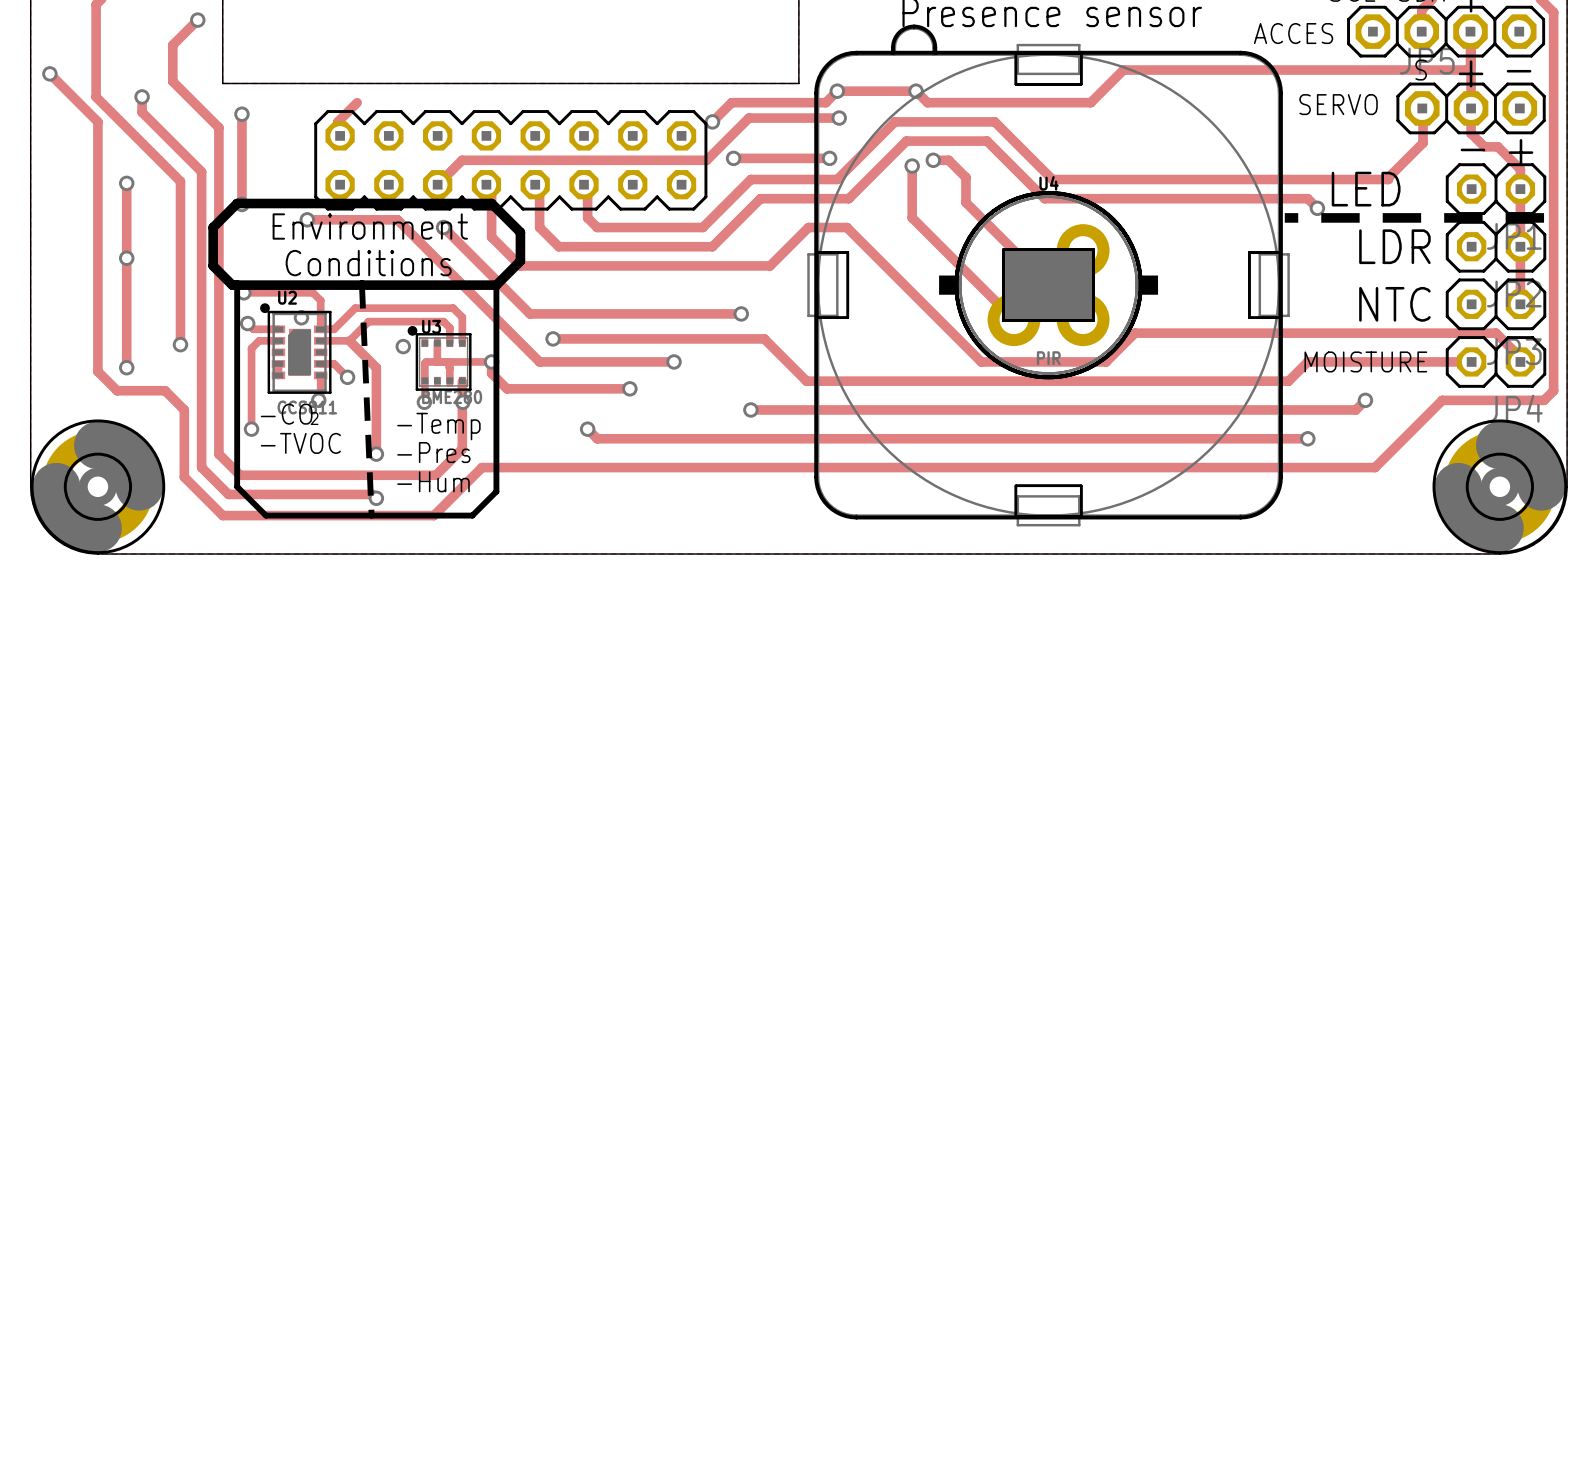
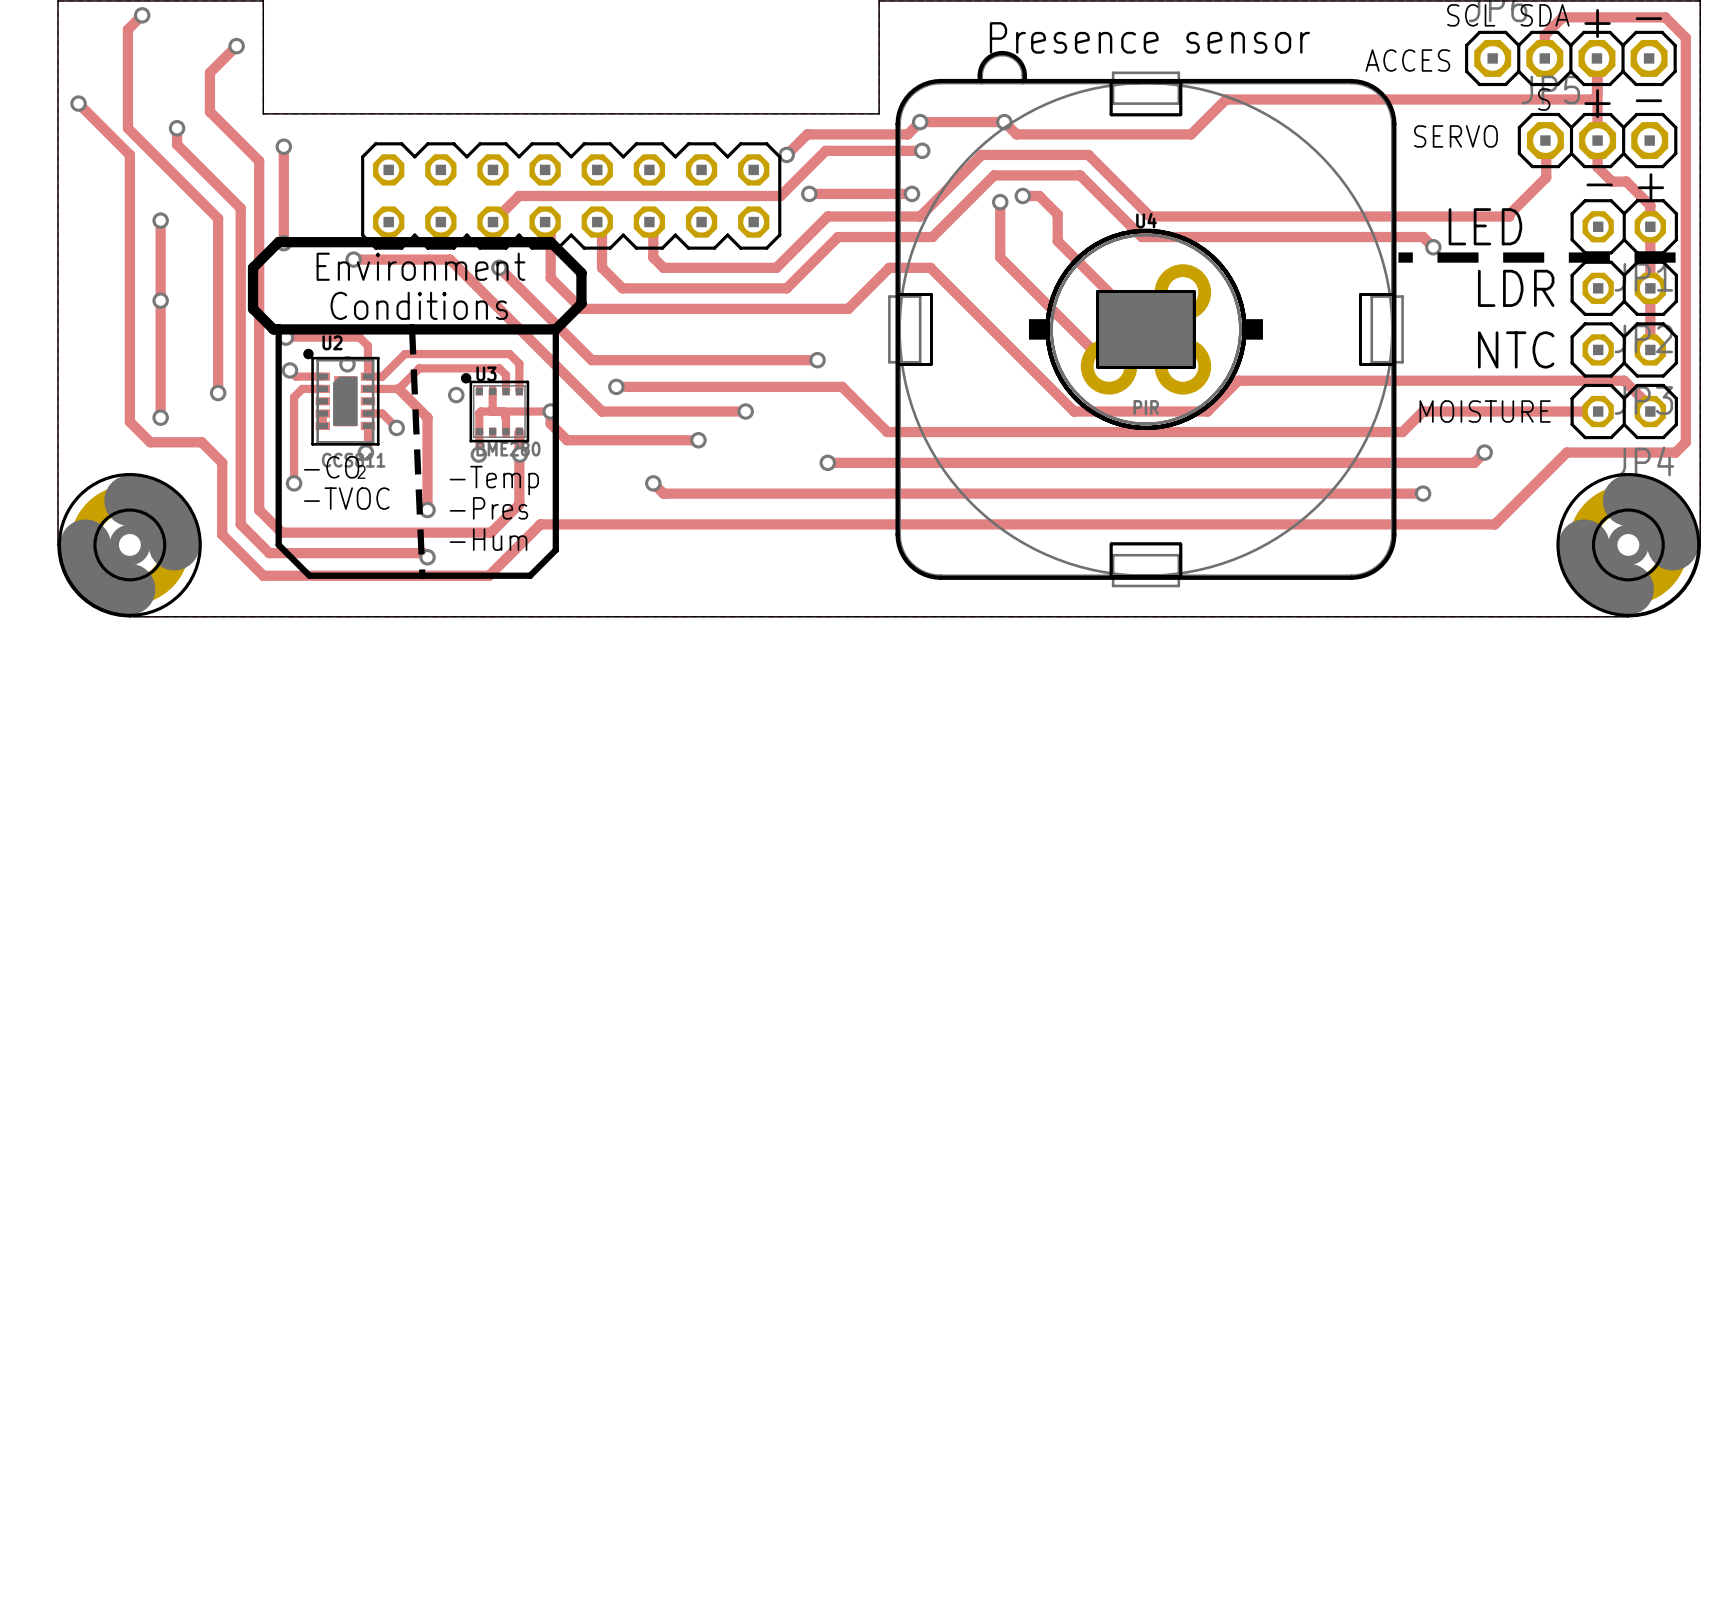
track: (357, 102) (337, 121) (337, 133) (340, 135) -> none

